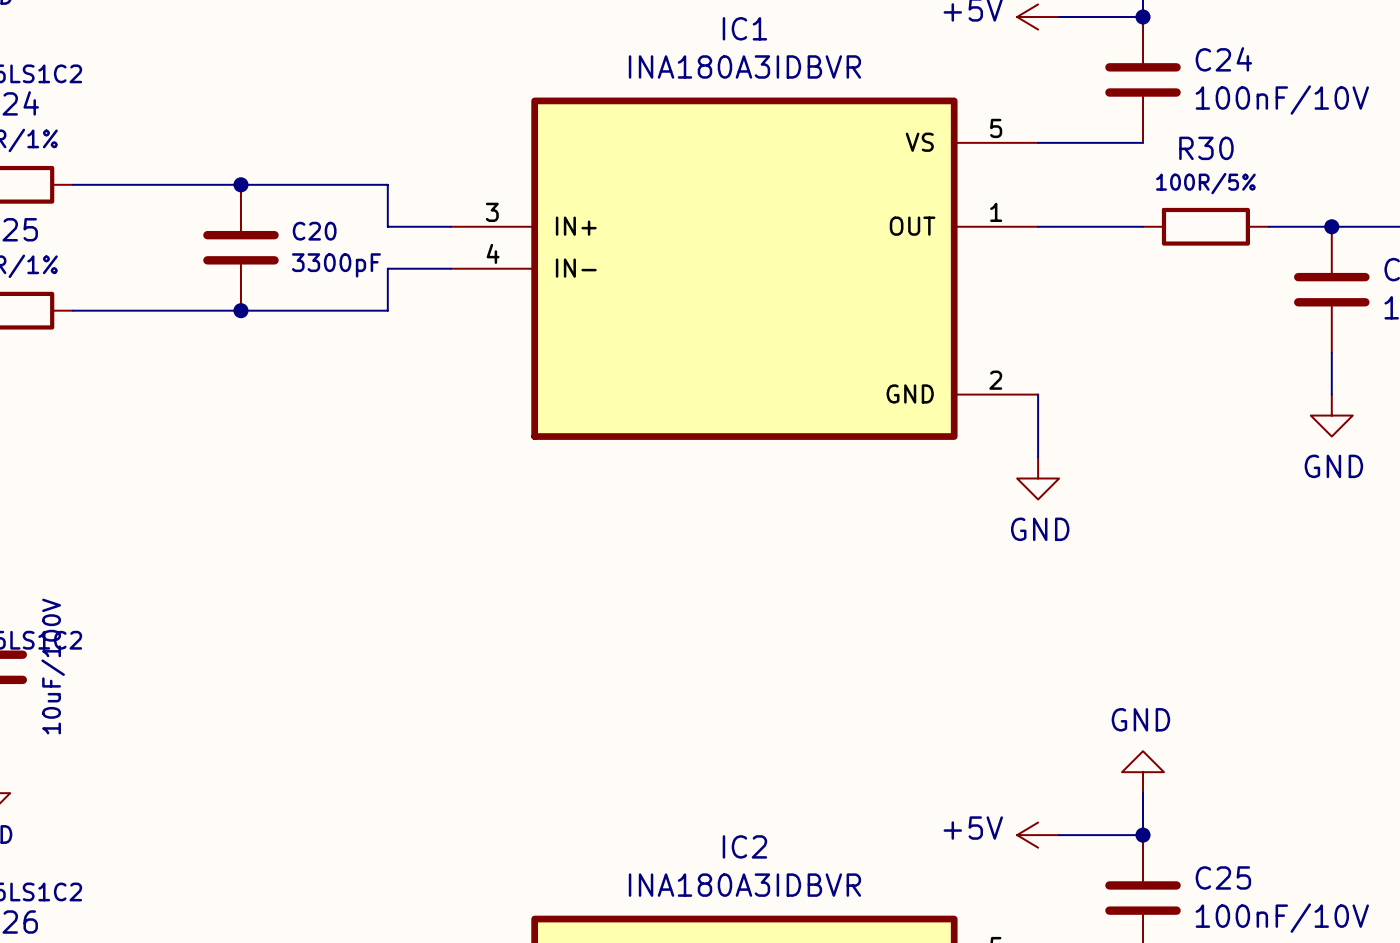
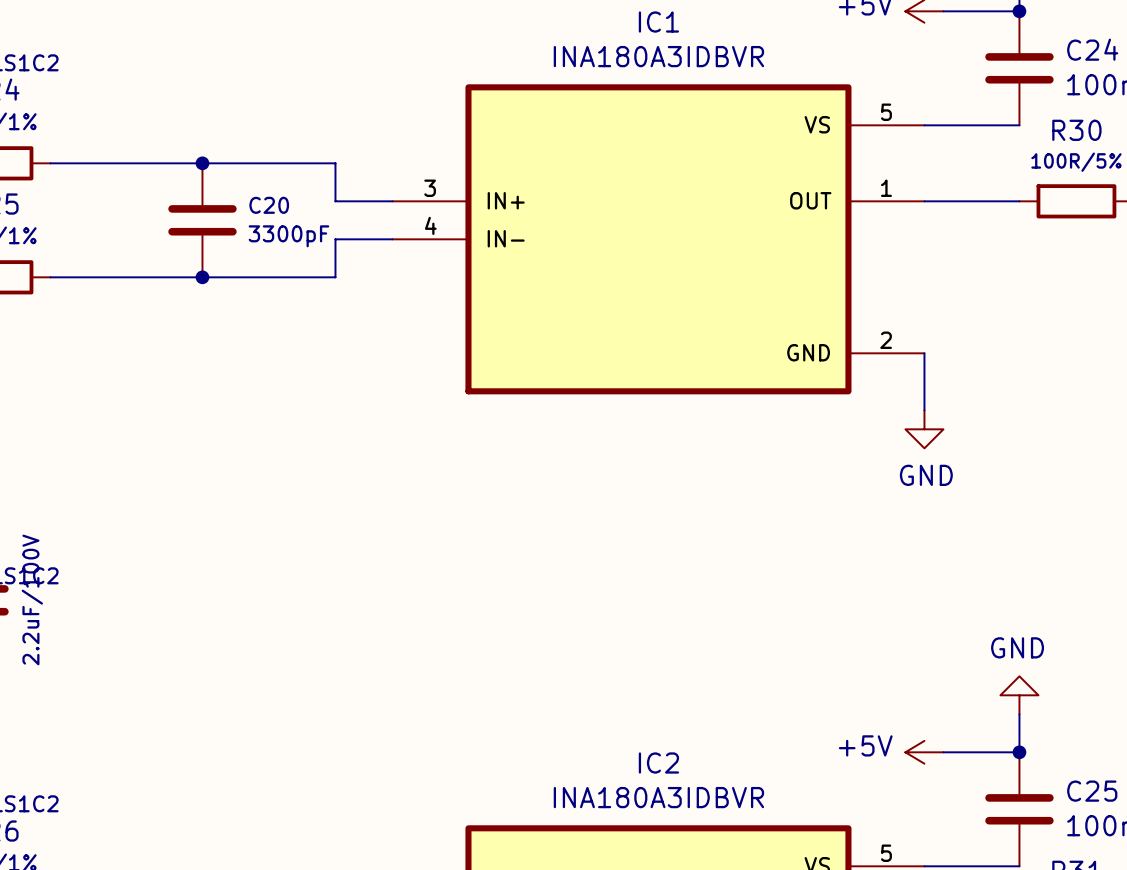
part value: 10uF/100V (53, 666) -> 2.2uF/100V (32, 599)

